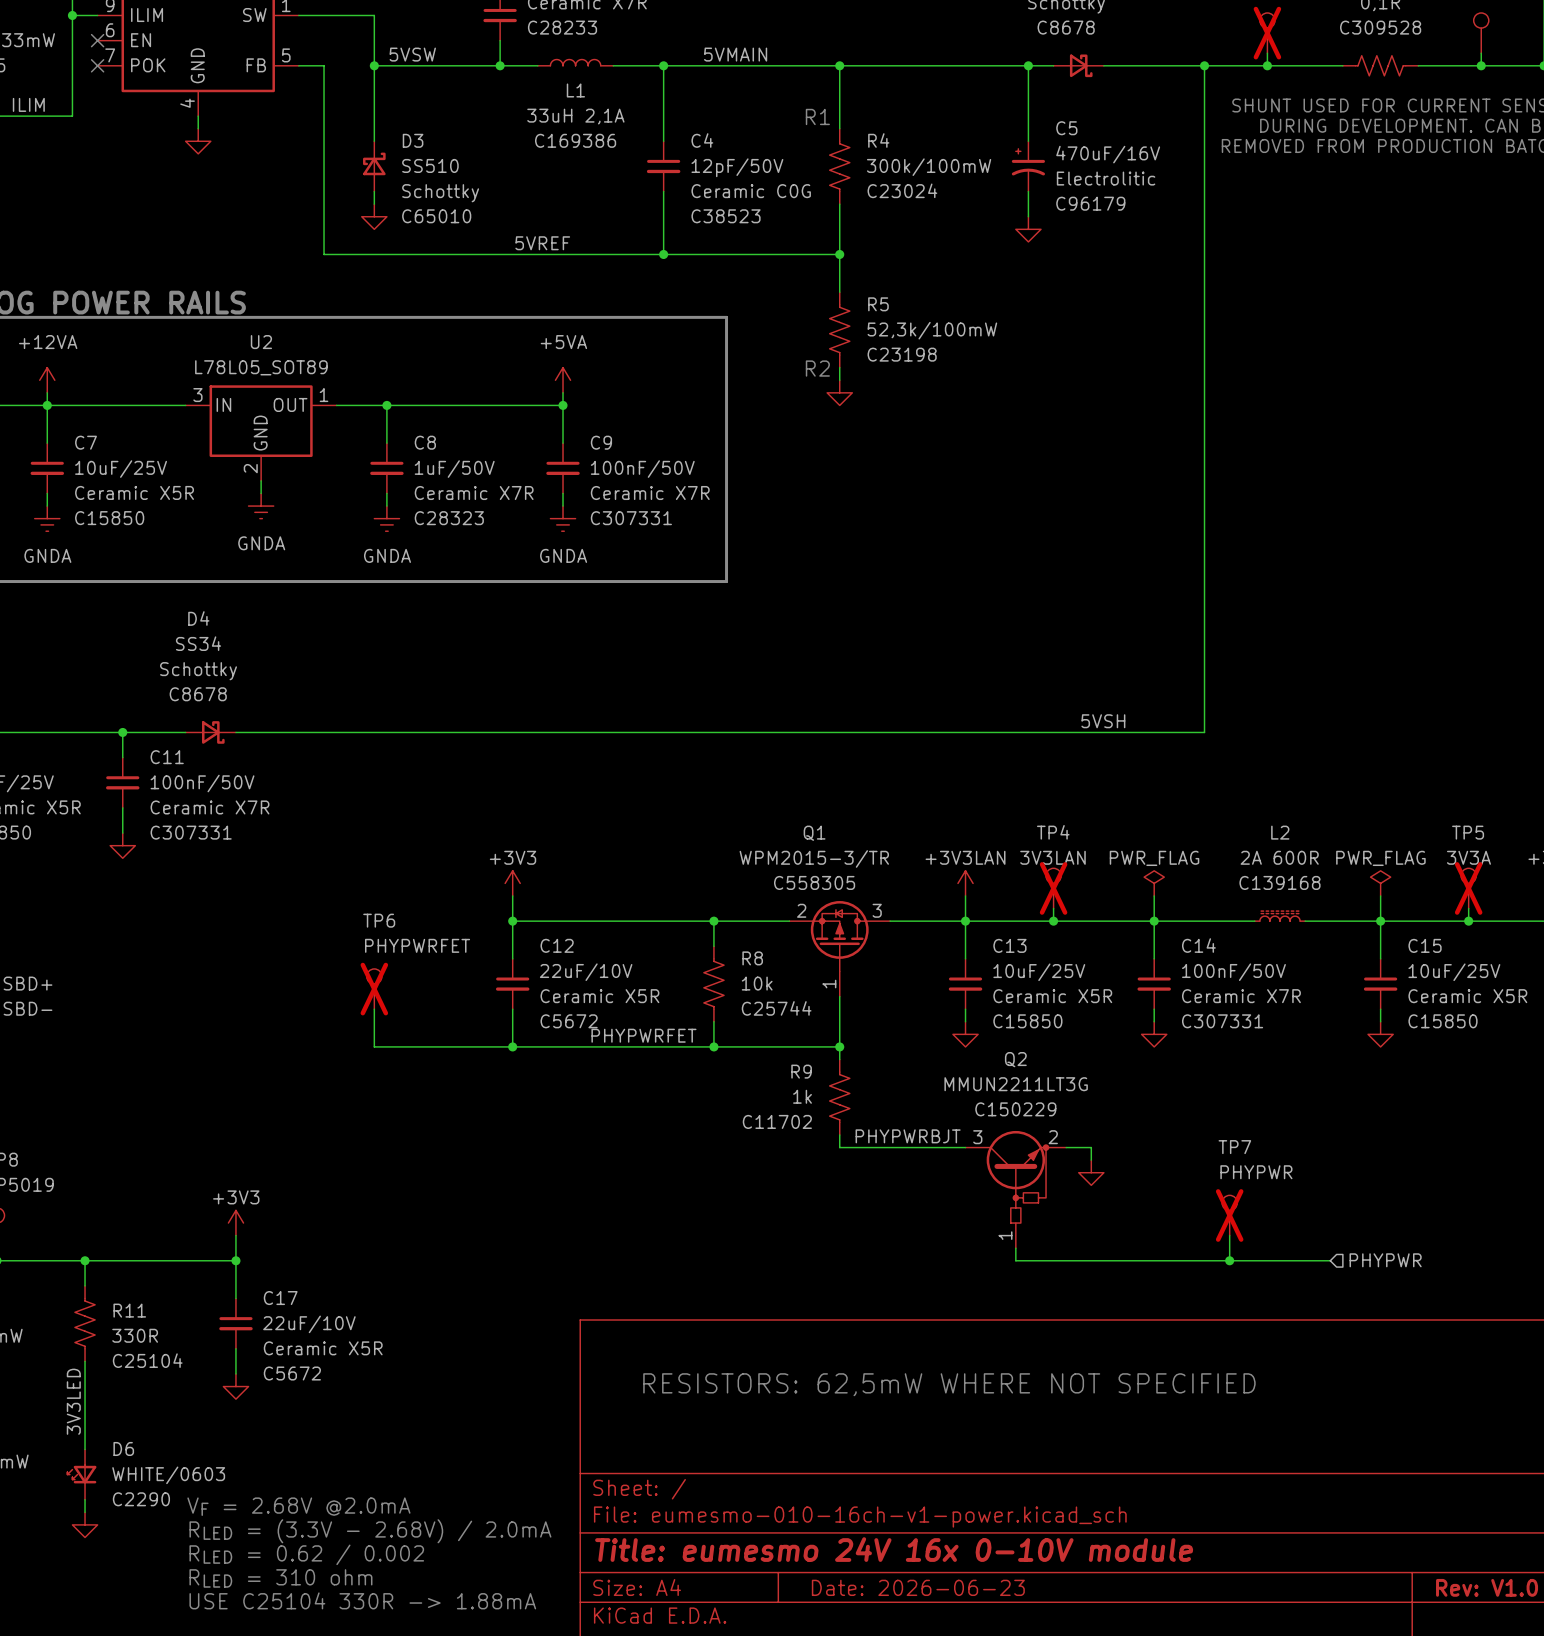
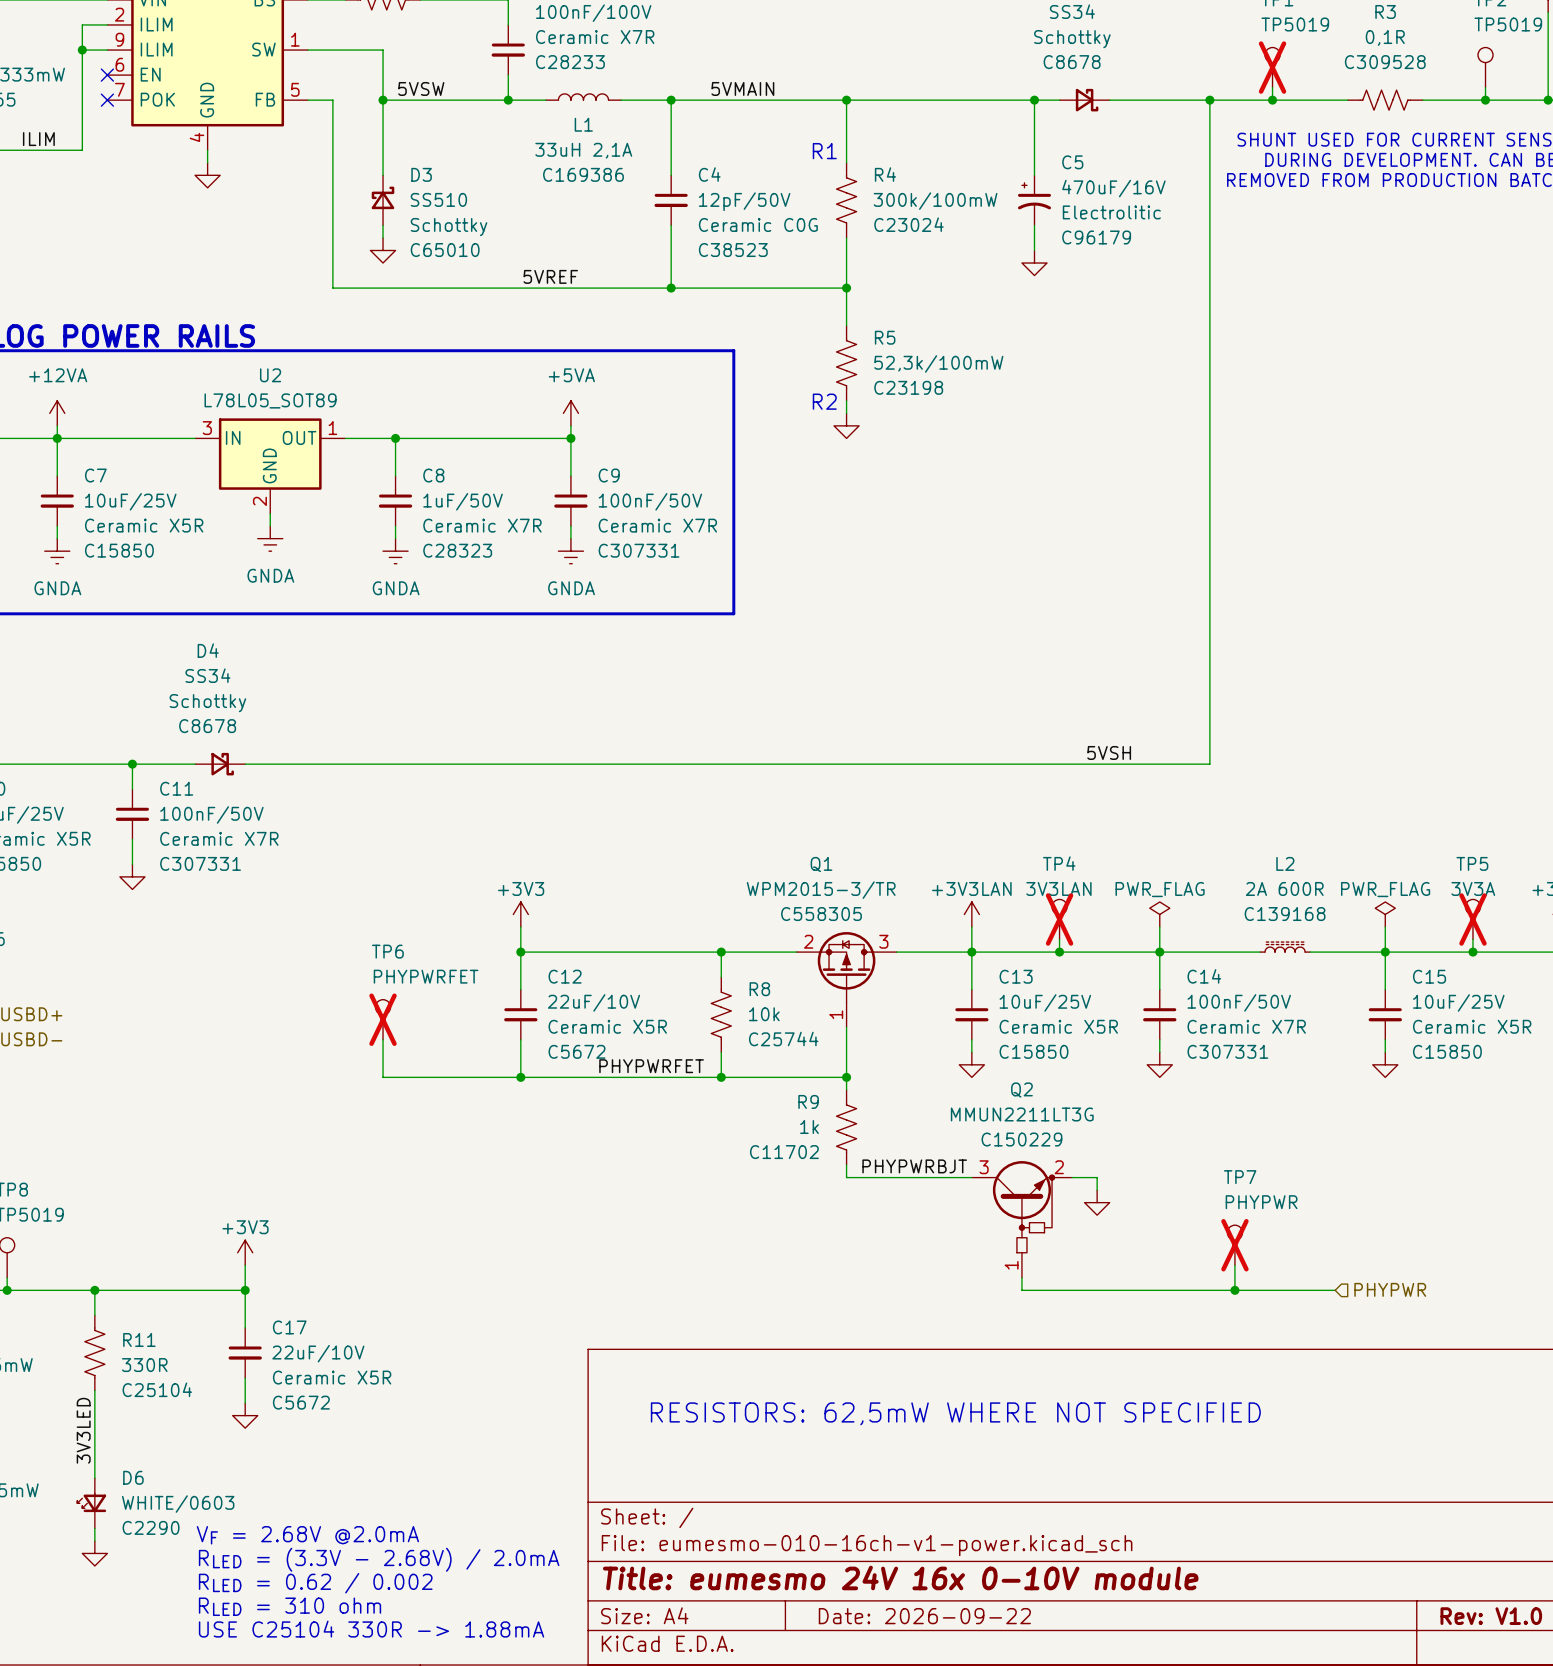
title block: Date: 2026-06-23 (918, 1587) -> Date: 2026-09-22 (924, 1616)

